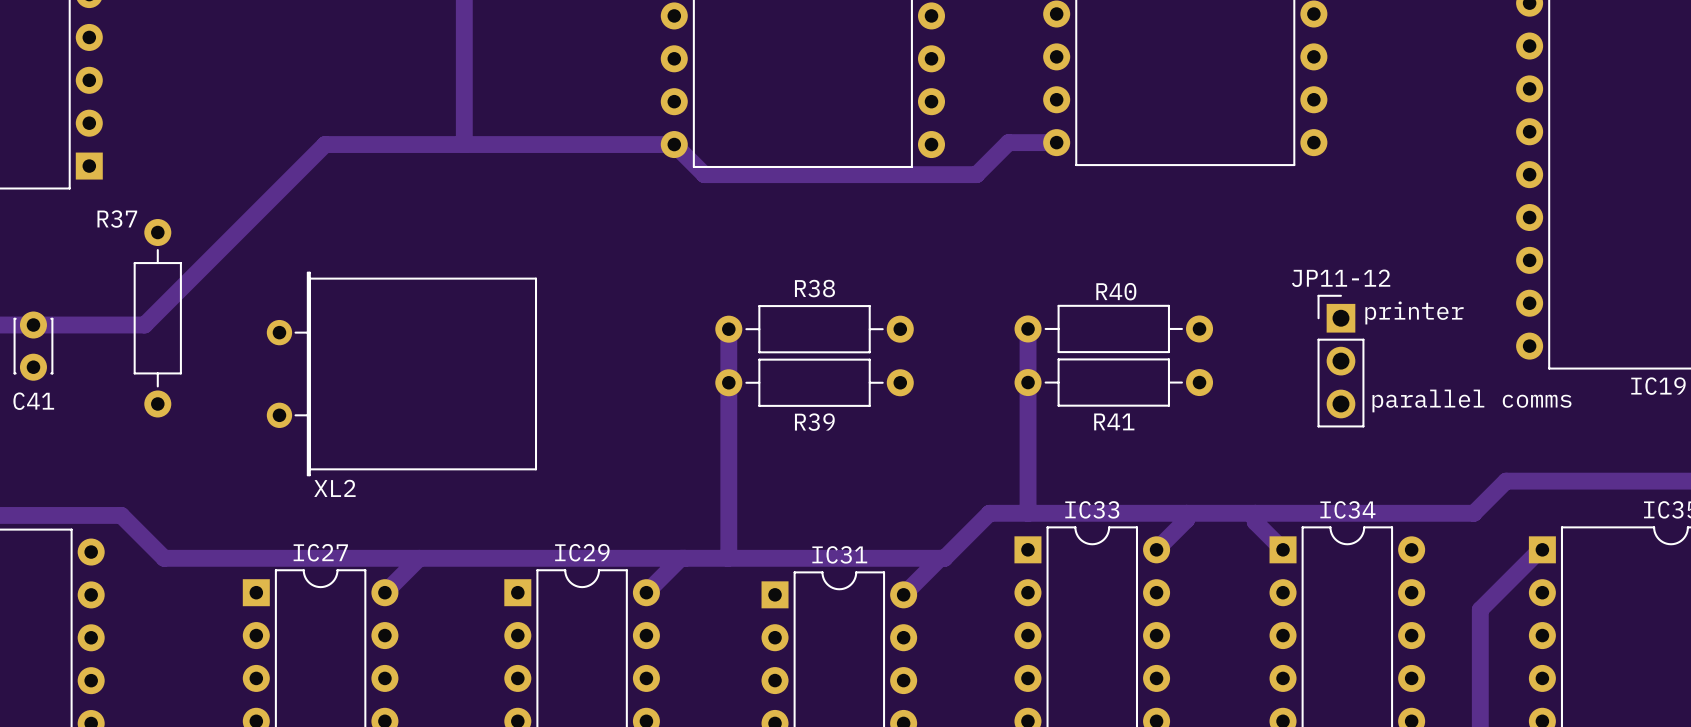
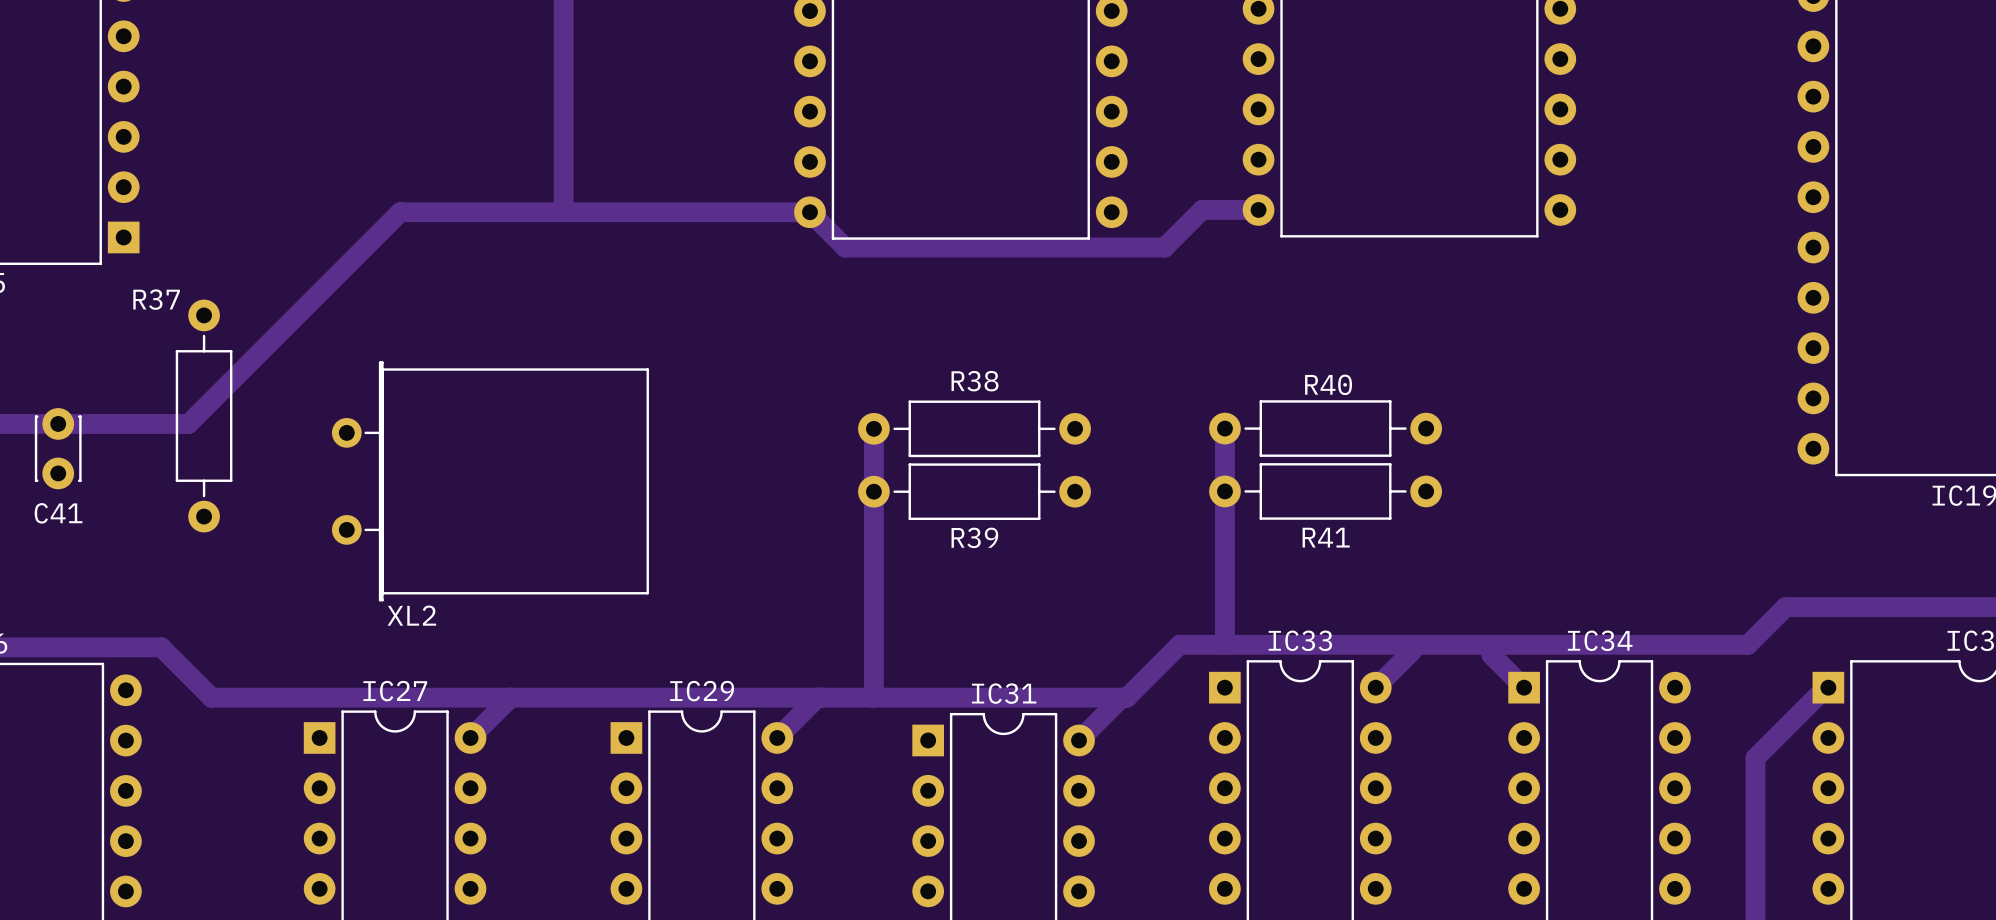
text: printer (1414, 312) -> none
JP11-12: (1340, 361) -> none
text: parallel comms (1471, 400) -> none

